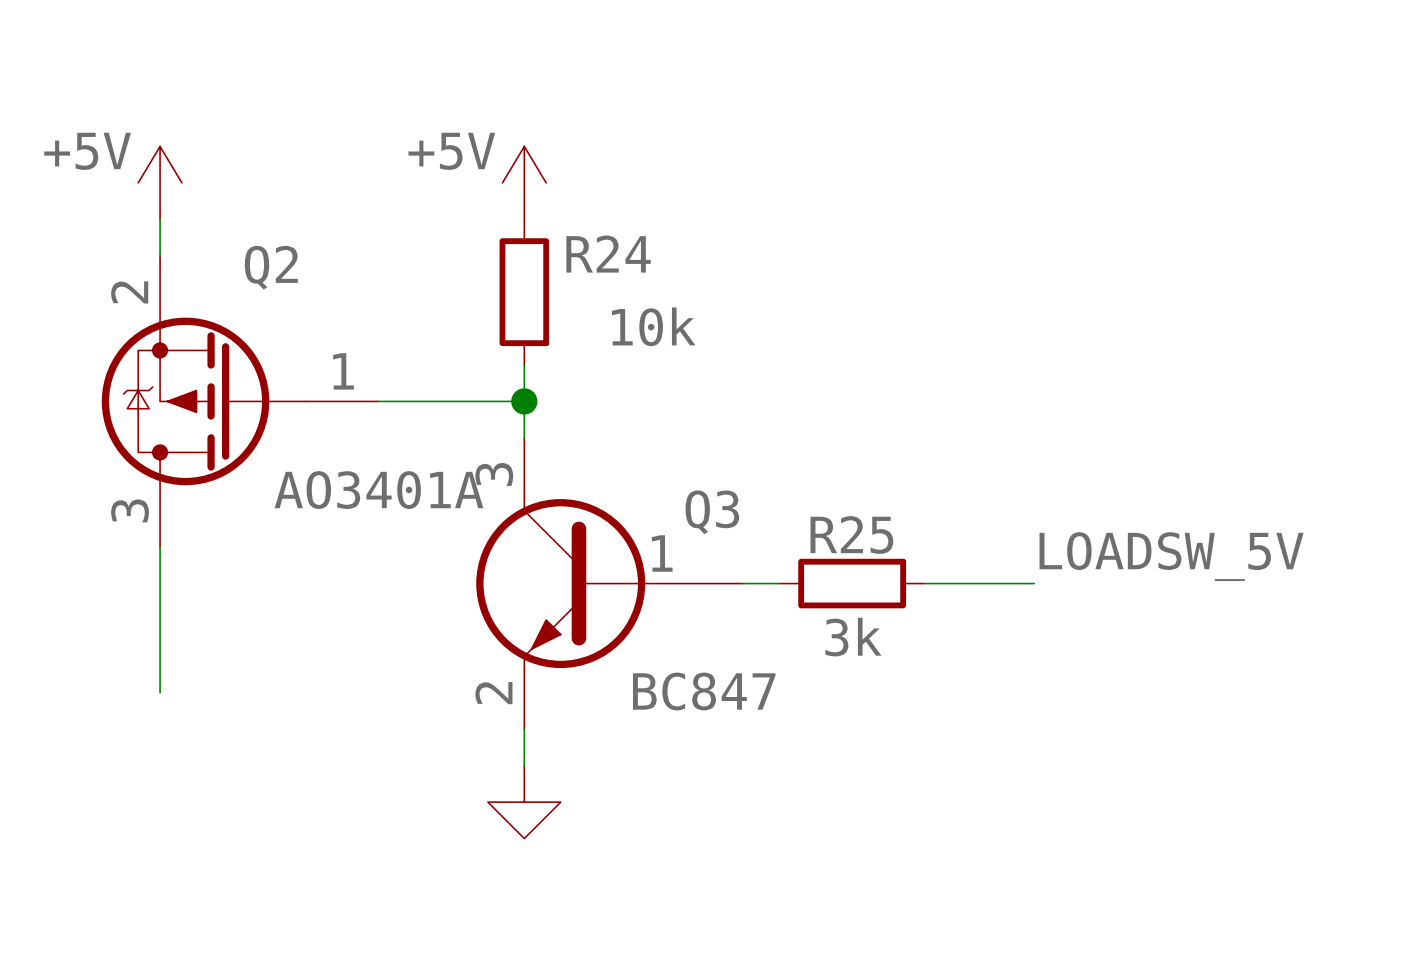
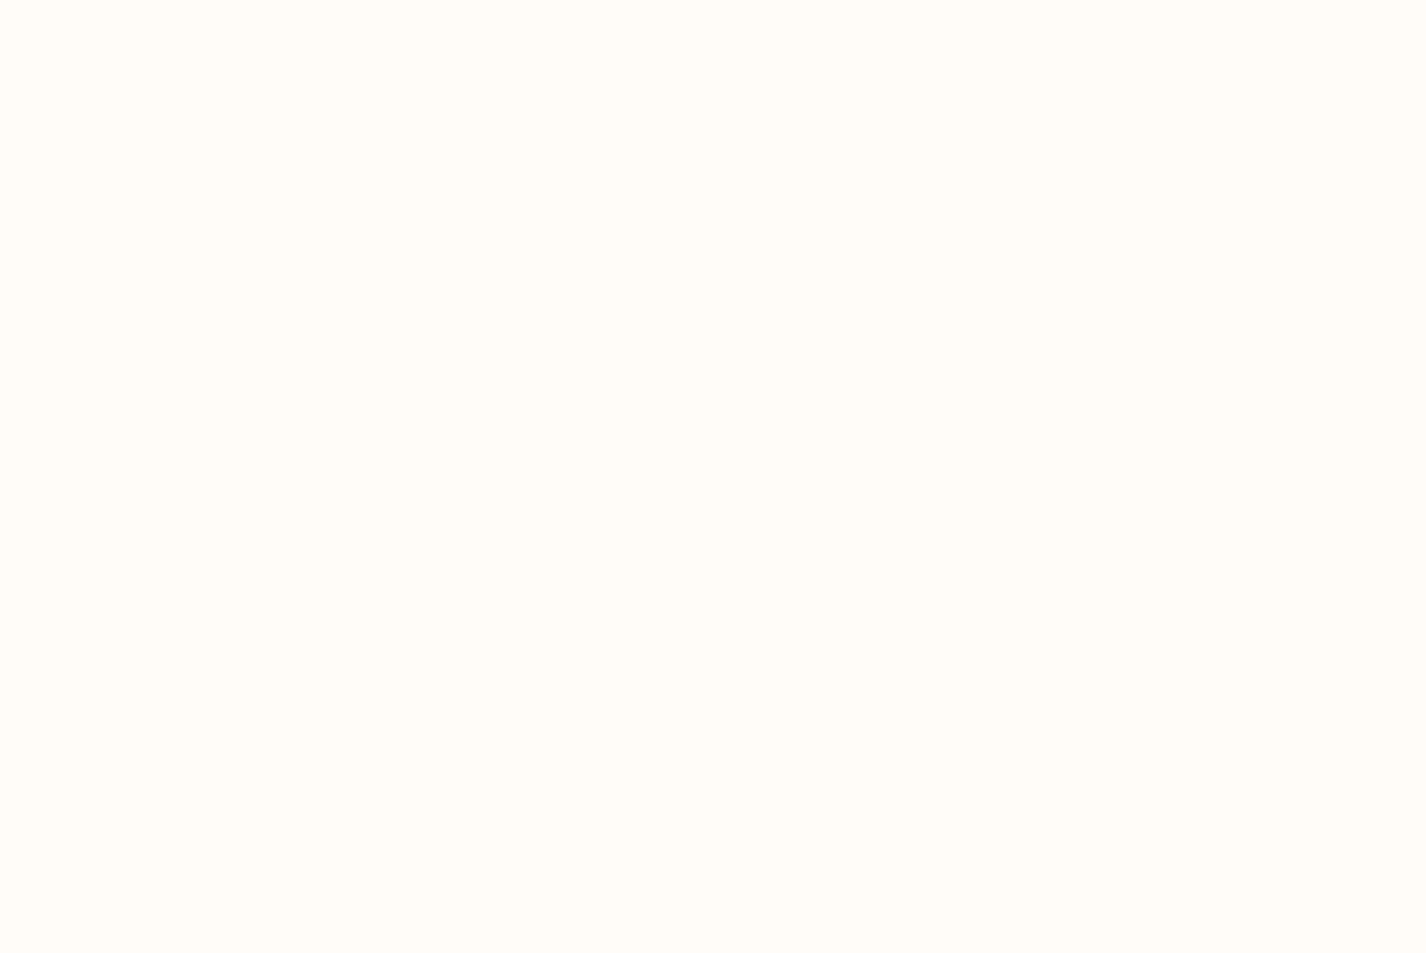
power symbol: +5V (160, 182) -> none
power symbol: +5V (524, 182) -> none
wire: (160, 219) (160, 255) -> none
R24: 10k (524, 292) -> none
wire: (524, 365) (524, 437) -> none
Q2: AO3401A (240, 401) -> none
wire: (378, 401) (524, 401) -> none
junction: (524, 401) -> none
wire: (160, 547) (160, 692) -> none
label: LOADSW_5V (1171, 556) -> none
Q3: BC847 (609, 583) -> none
wire: (742, 583) (779, 583) -> none
R25: 3k (852, 583) -> none
wire: (925, 583) (1034, 583) -> none
wire: (524, 729) (524, 765) -> none
power symbol: (524, 802) -> none

